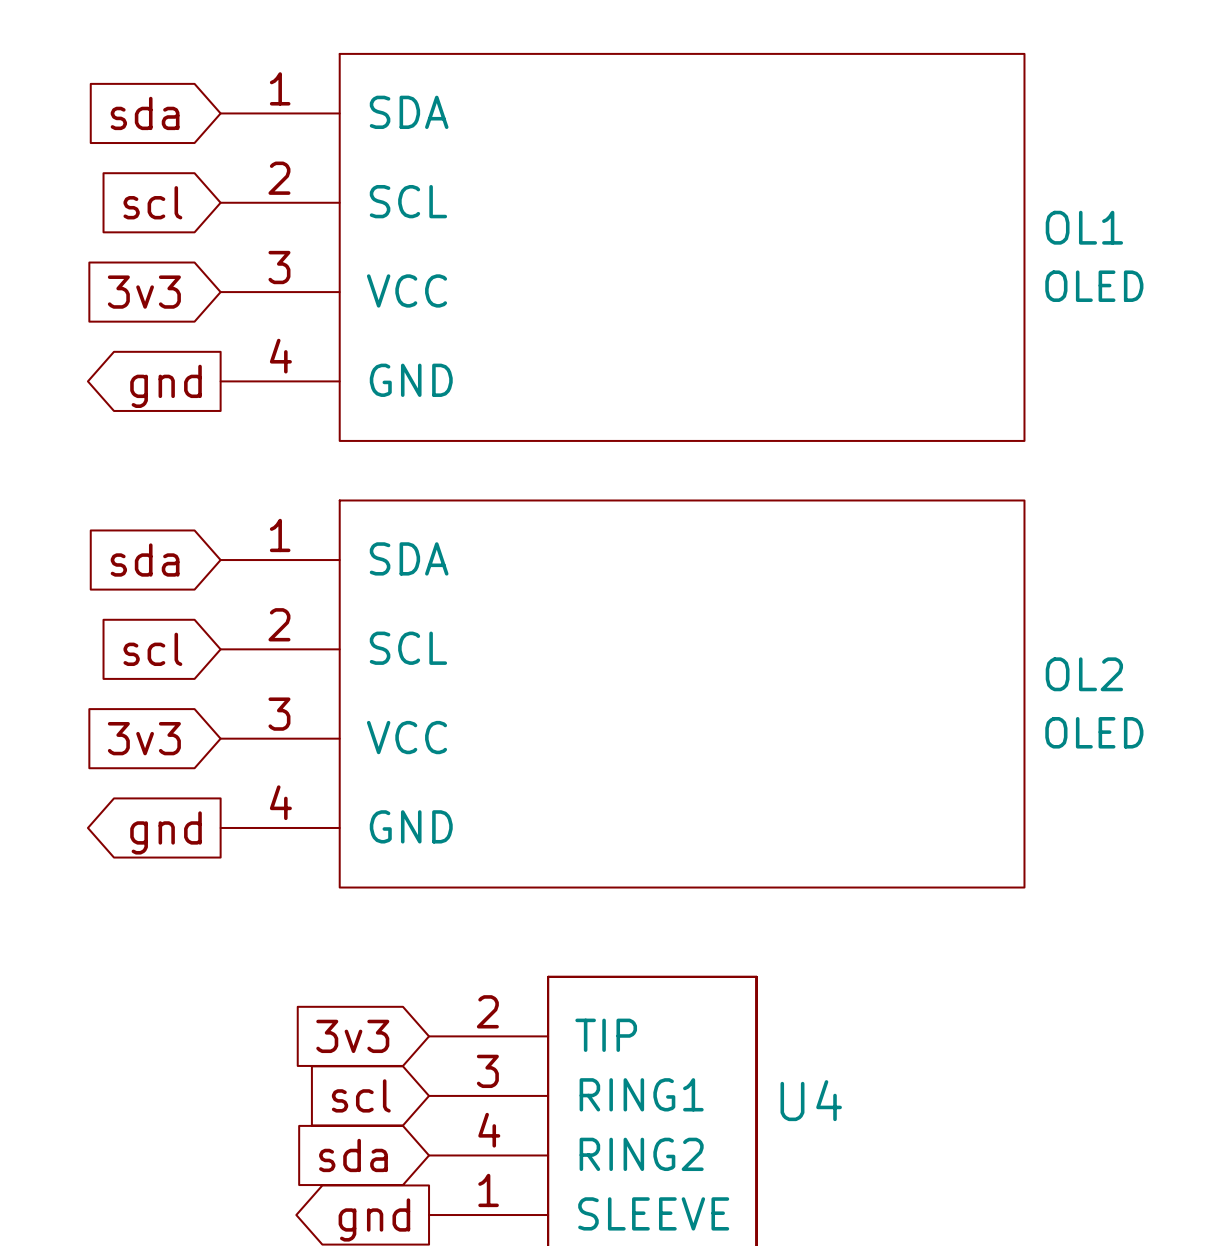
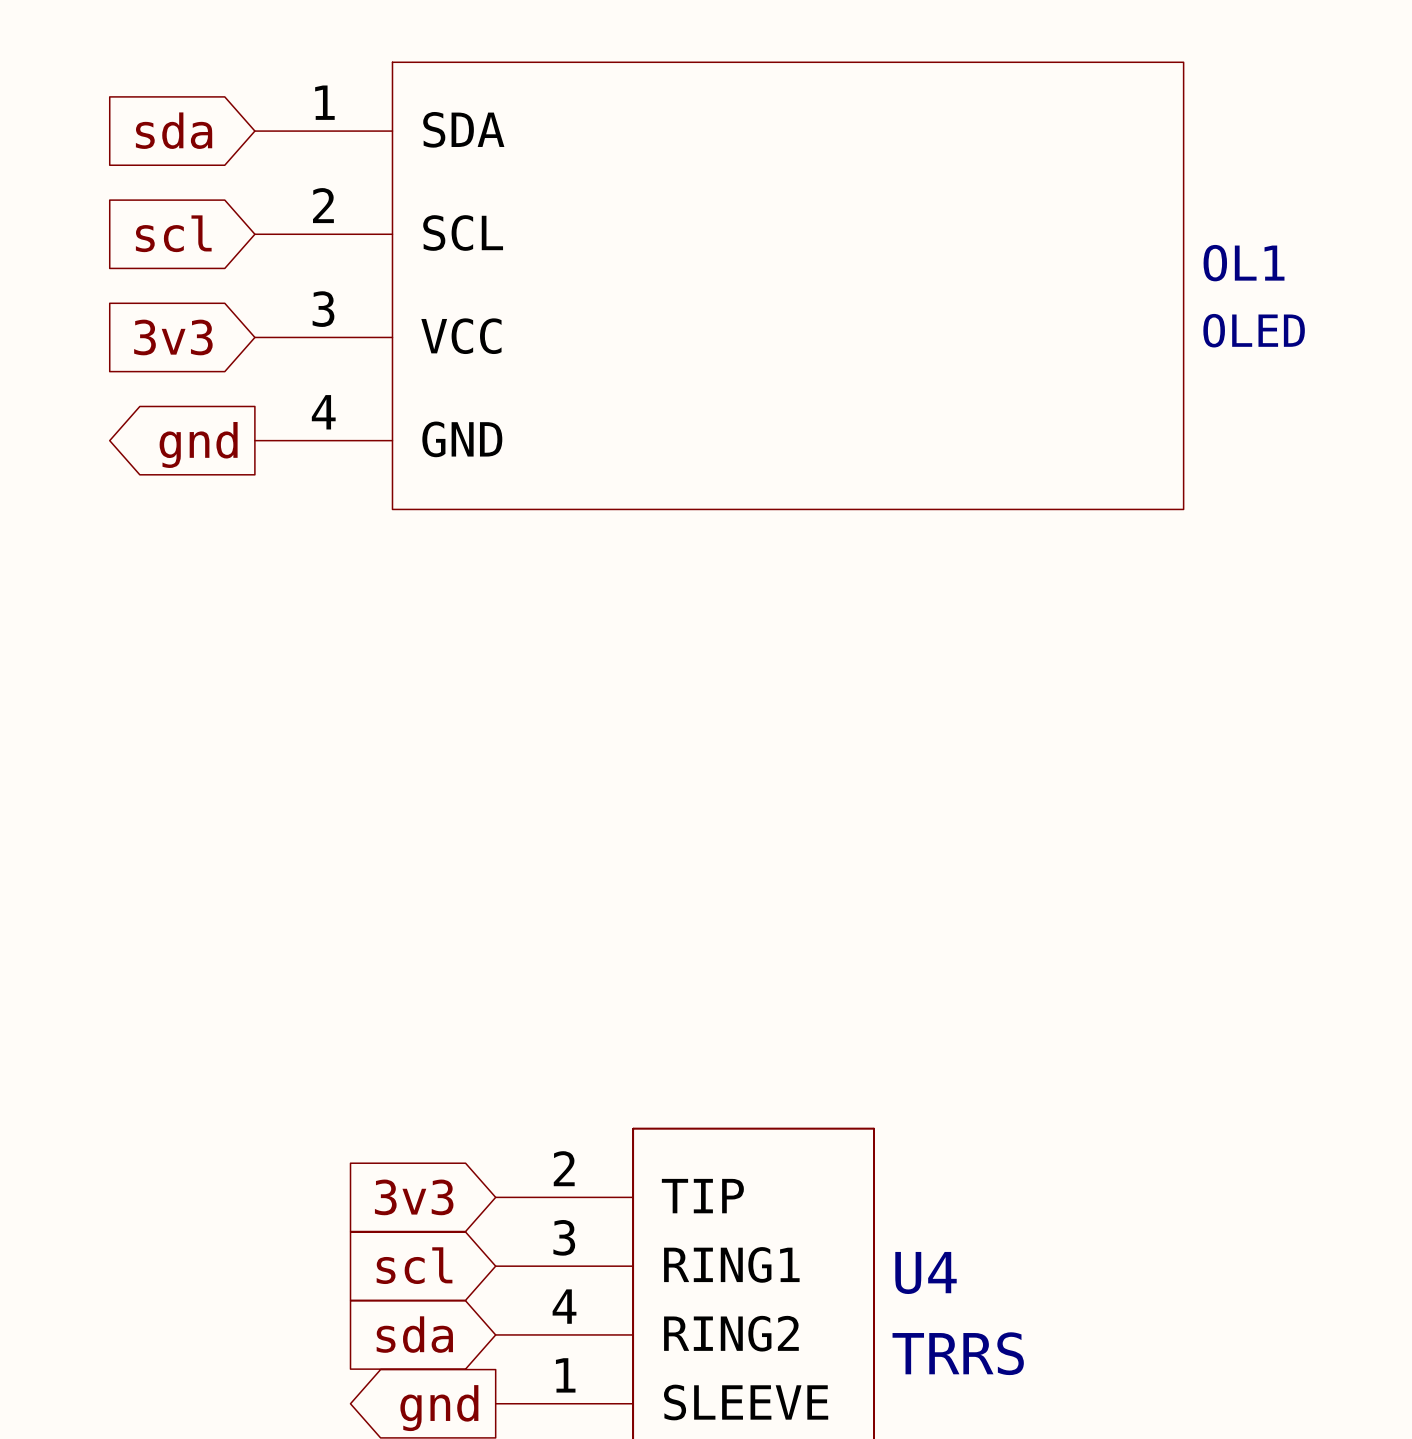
global label: sda (145, 560) -> none
global label: scl (152, 649) -> none
OL2: OLED (622, 694) -> none
global label: 3v3 (144, 738) -> none
global label: gnd (166, 832) -> none
U4 value: none -> TRRS (958, 1353)

